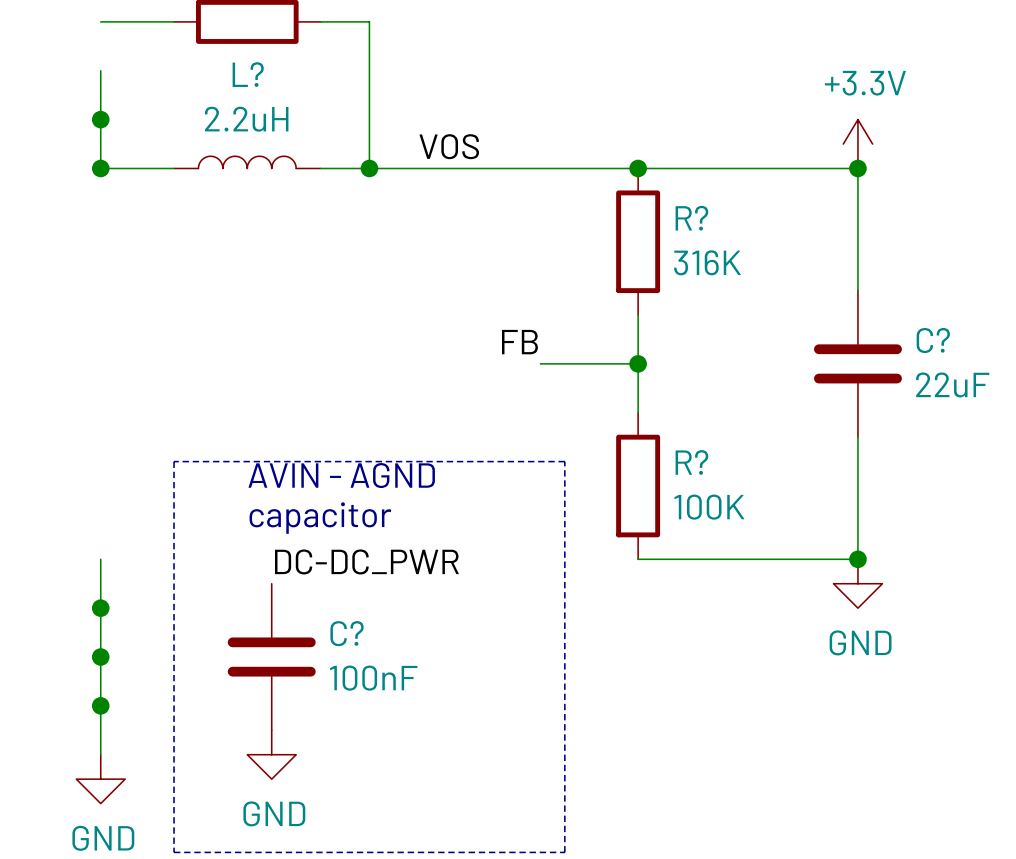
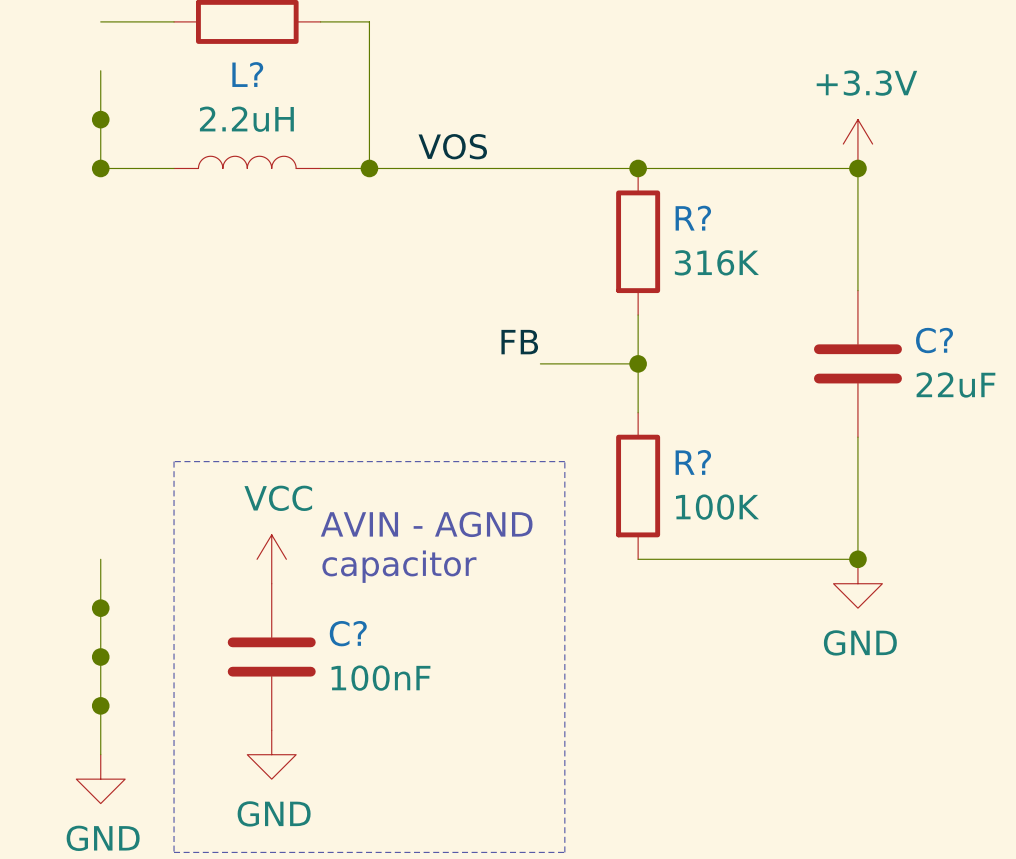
text position: AVIN - AGND (341, 475) -> AVIN - AGND (426, 524)
text position: capacitor (320, 518) -> capacitor (399, 566)
power symbol: none -> VCC (271, 559)
label: DC-DC_PWR (366, 561) -> none

